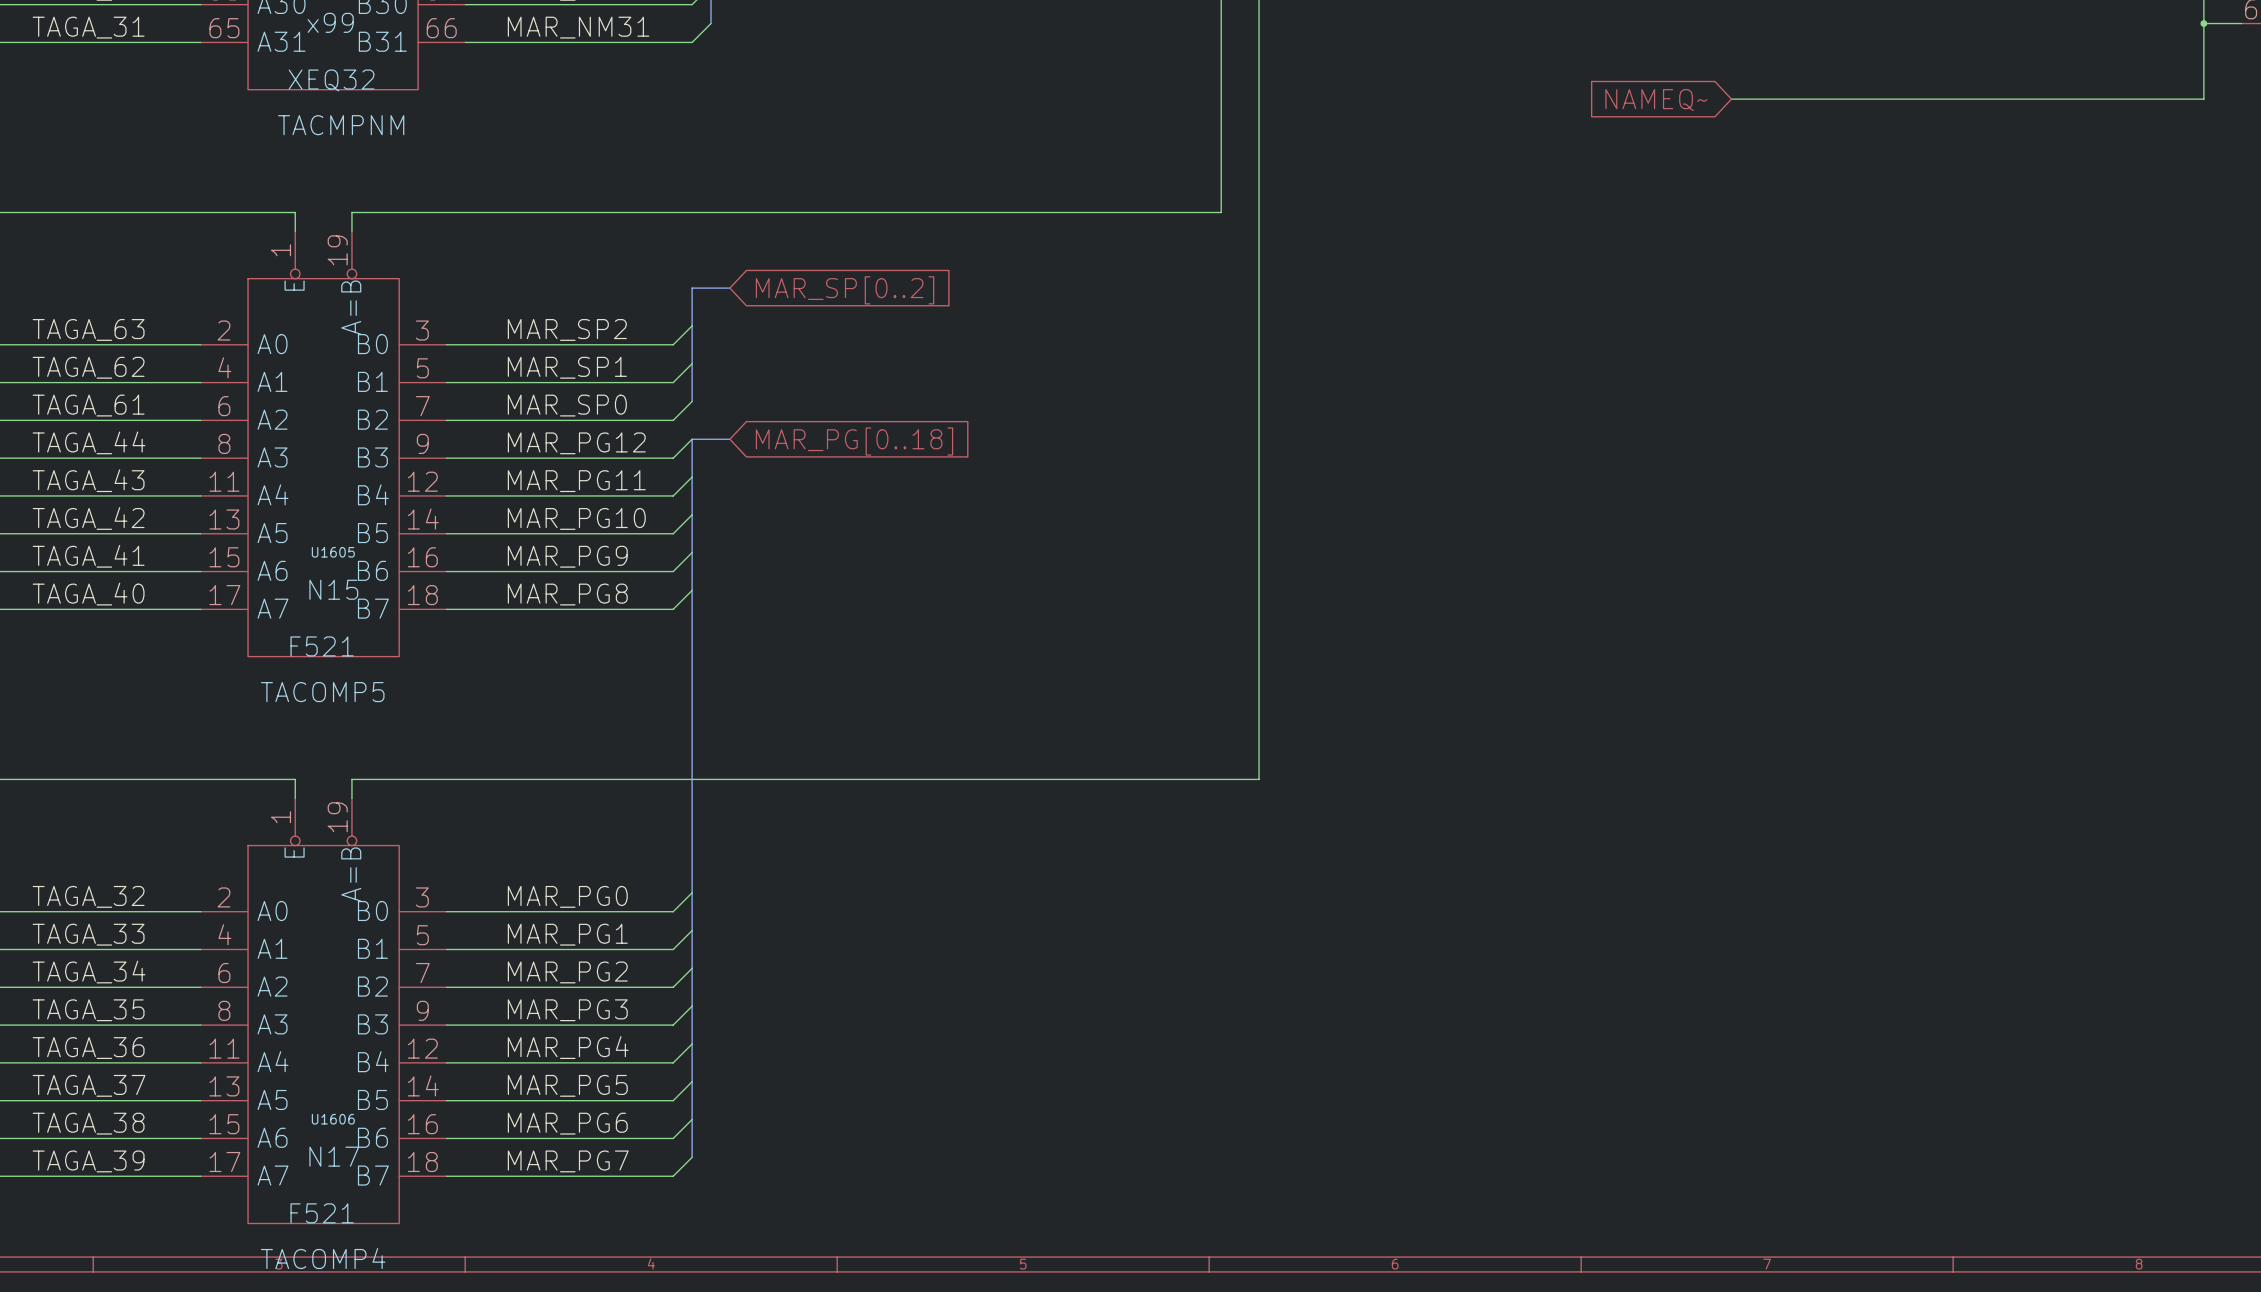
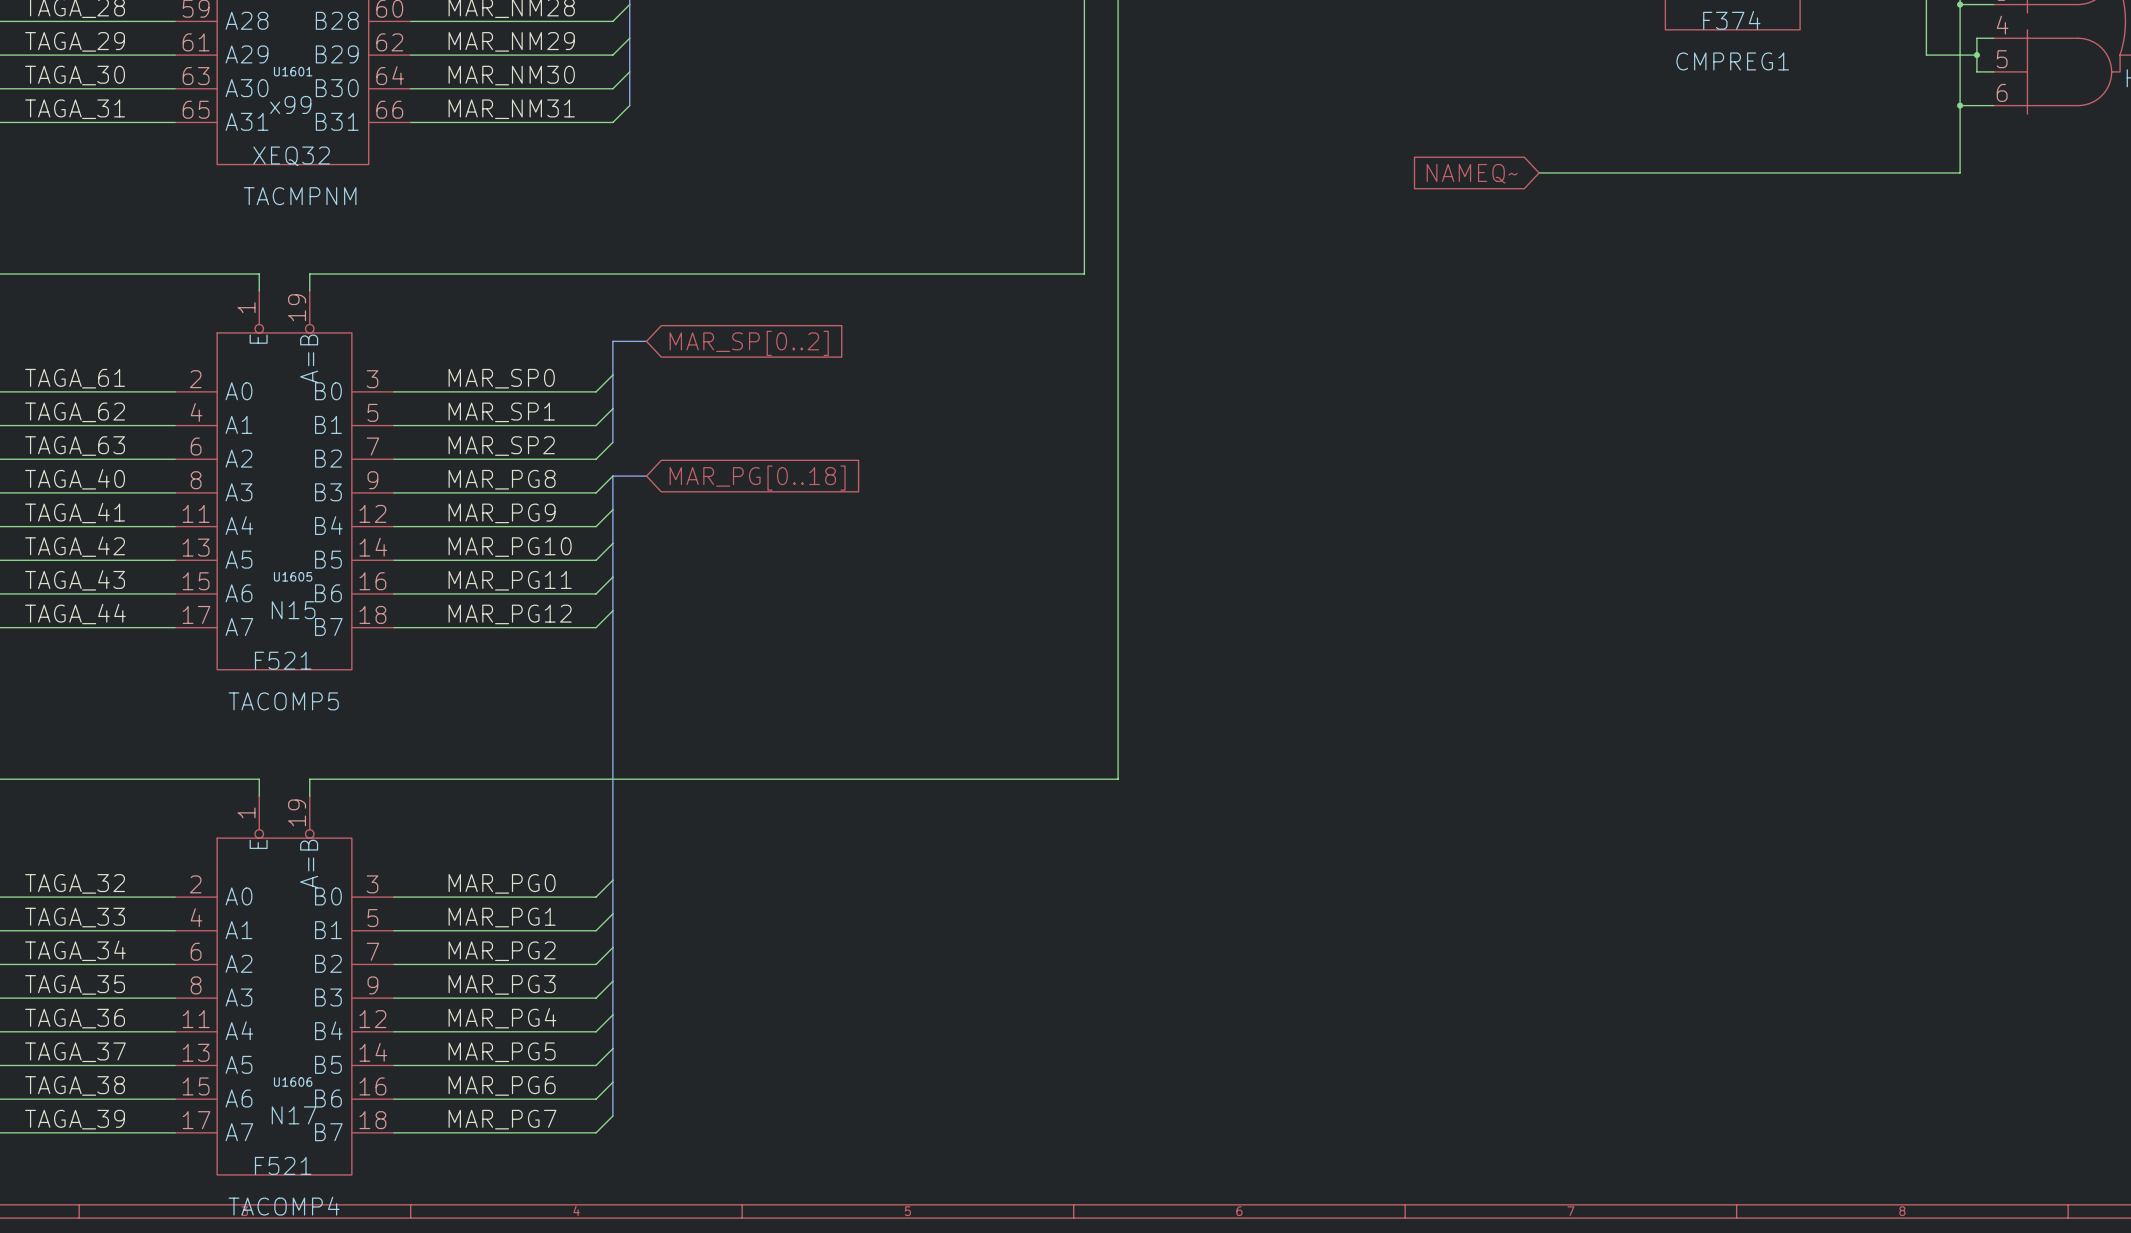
label: TAGA_63 (88, 329) -> TAGA_61 (75, 378)
label: MAR_SP2 (567, 329) -> MAR_SP0 (501, 378)
label: TAGA_61 (88, 405) -> TAGA_63 (75, 446)
label: MAR_SP0 (567, 405) -> MAR_SP2 (501, 446)
label: TAGA_44 (89, 442) -> TAGA_40 (75, 479)
label: MAR_PG12 (576, 443) -> MAR_PG8 (502, 479)
label: TAGA_43 (88, 480) -> TAGA_41 (75, 512)
label: MAR_PG11 (576, 481) -> MAR_PG9 (502, 513)
label: TAGA_41 (88, 556) -> TAGA_43 (75, 580)
label: MAR_PG9 (567, 556) -> MAR_PG11 (510, 580)
label: TAGA_40 (88, 594) -> TAGA_44 (75, 614)
label: MAR_PG8 (567, 594) -> MAR_PG12 (510, 614)

